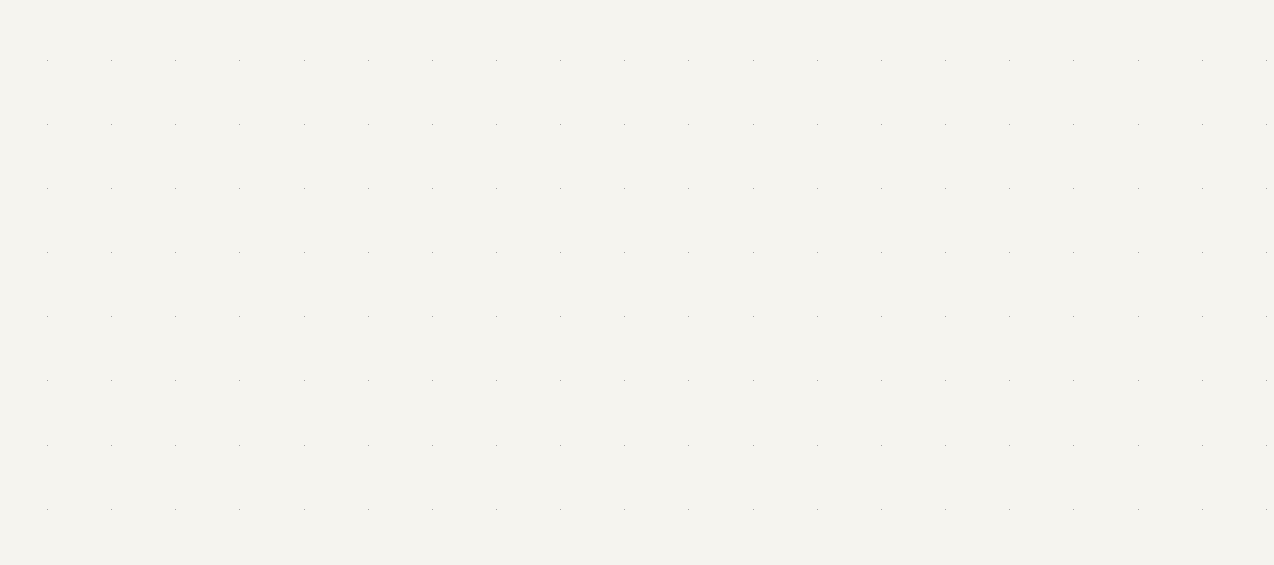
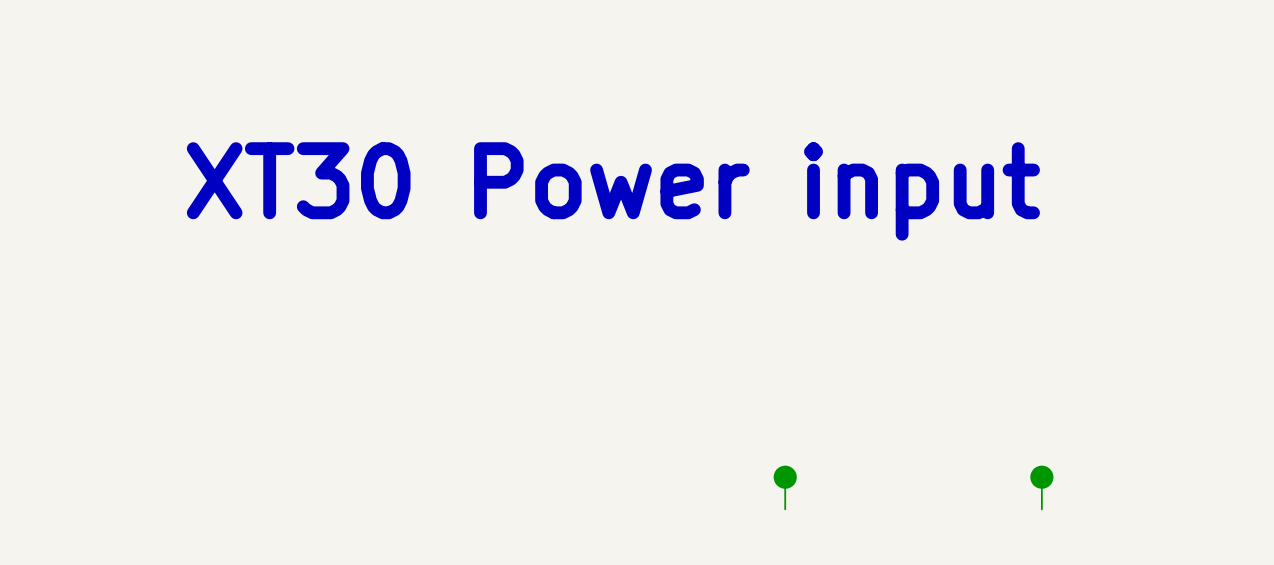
text: none -> XT30 Power input (613, 191)
wire: none -> (785, 477) (785, 509)
junction: none -> (785, 477)
wire: none -> (1041, 477) (1041, 509)
junction: none -> (1041, 477)

